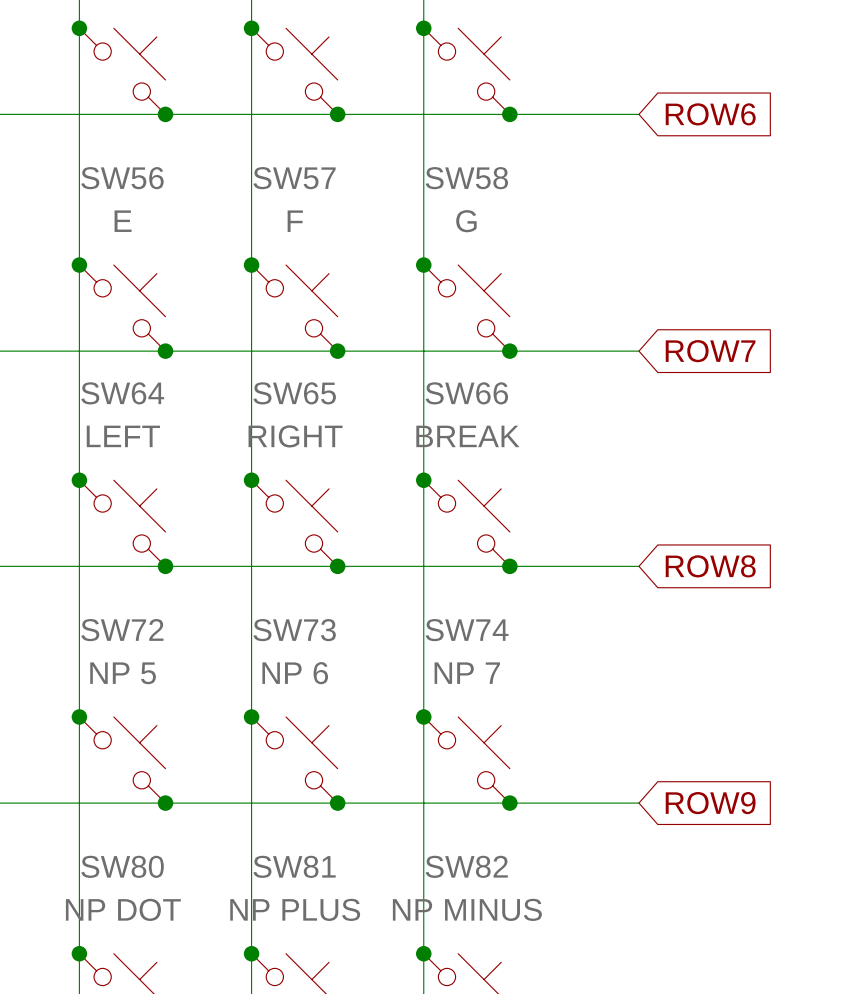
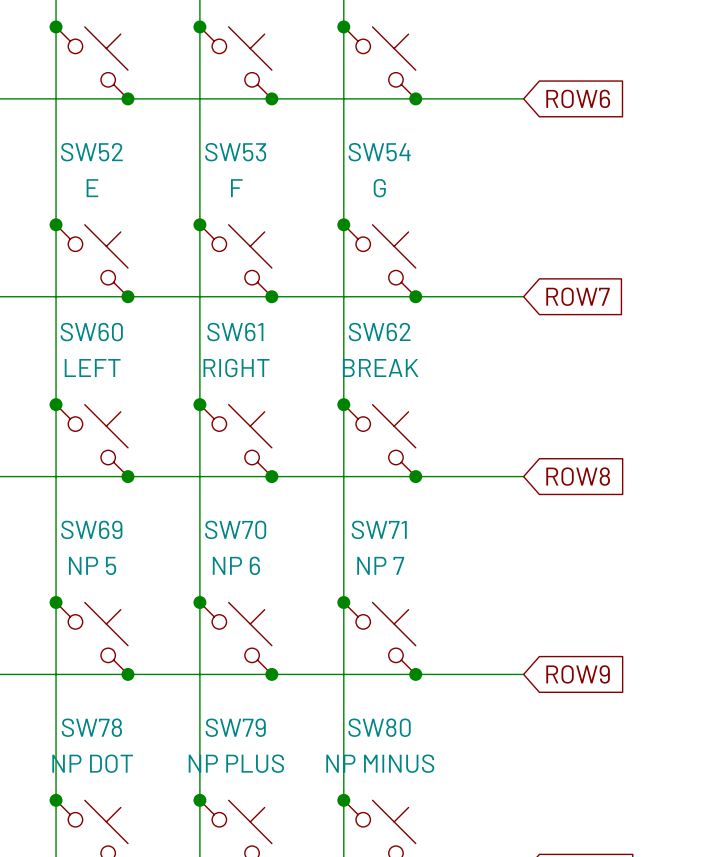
SW56 name: SW56 (122, 178) -> SW52 (91, 152)
SW57 name: SW57 (294, 178) -> SW53 (235, 152)
SW58 name: SW58 (466, 178) -> SW54 (379, 152)
SW64 name: SW64 (122, 393) -> SW60 (91, 332)
SW65 name: SW65 (294, 393) -> SW61 (235, 332)
SW66 name: SW66 (466, 393) -> SW62 (379, 332)
SW72 name: SW72 (122, 630) -> SW69 (91, 529)
SW73 name: SW73 (294, 630) -> SW70 (235, 529)
SW74 name: SW74 (467, 630) -> SW71 (379, 529)
SW80 name: SW80 (122, 866) -> SW78 (91, 727)
SW81 name: SW81 (294, 866) -> SW79 (235, 727)
SW82 name: SW82 (466, 866) -> SW80 (379, 727)

